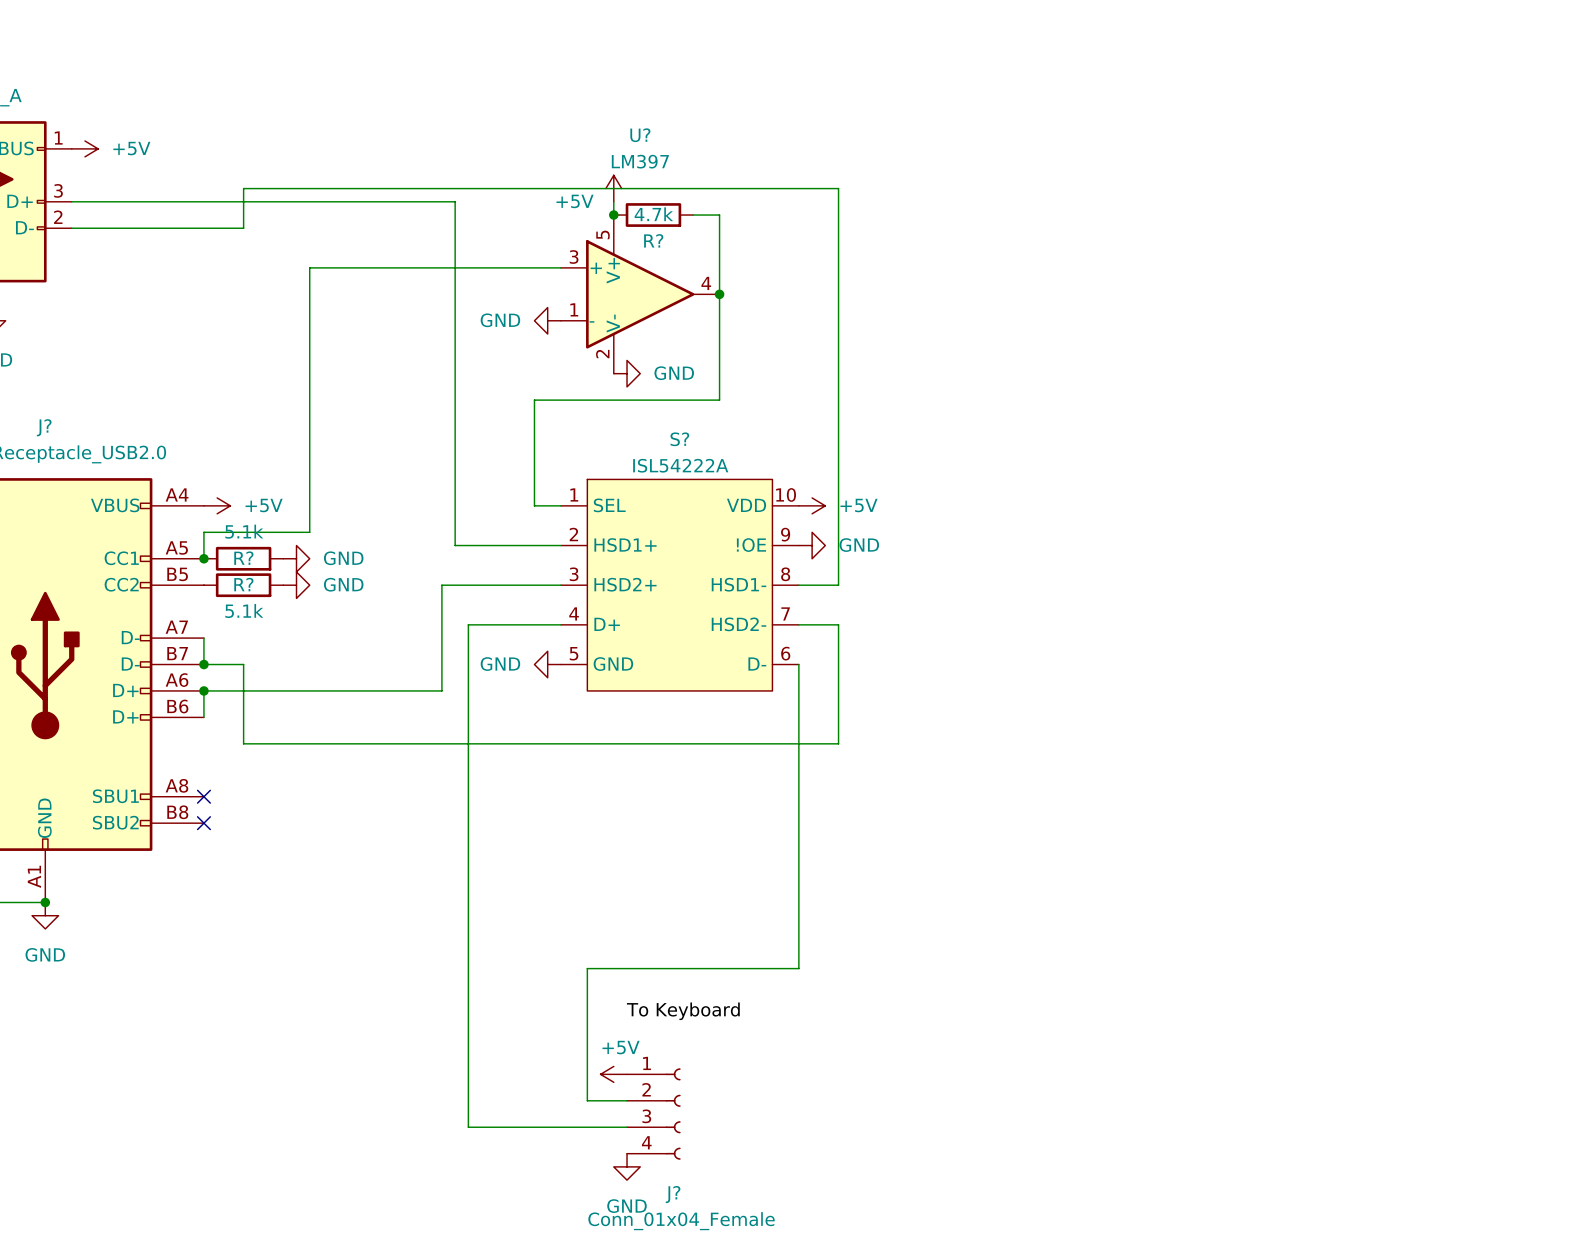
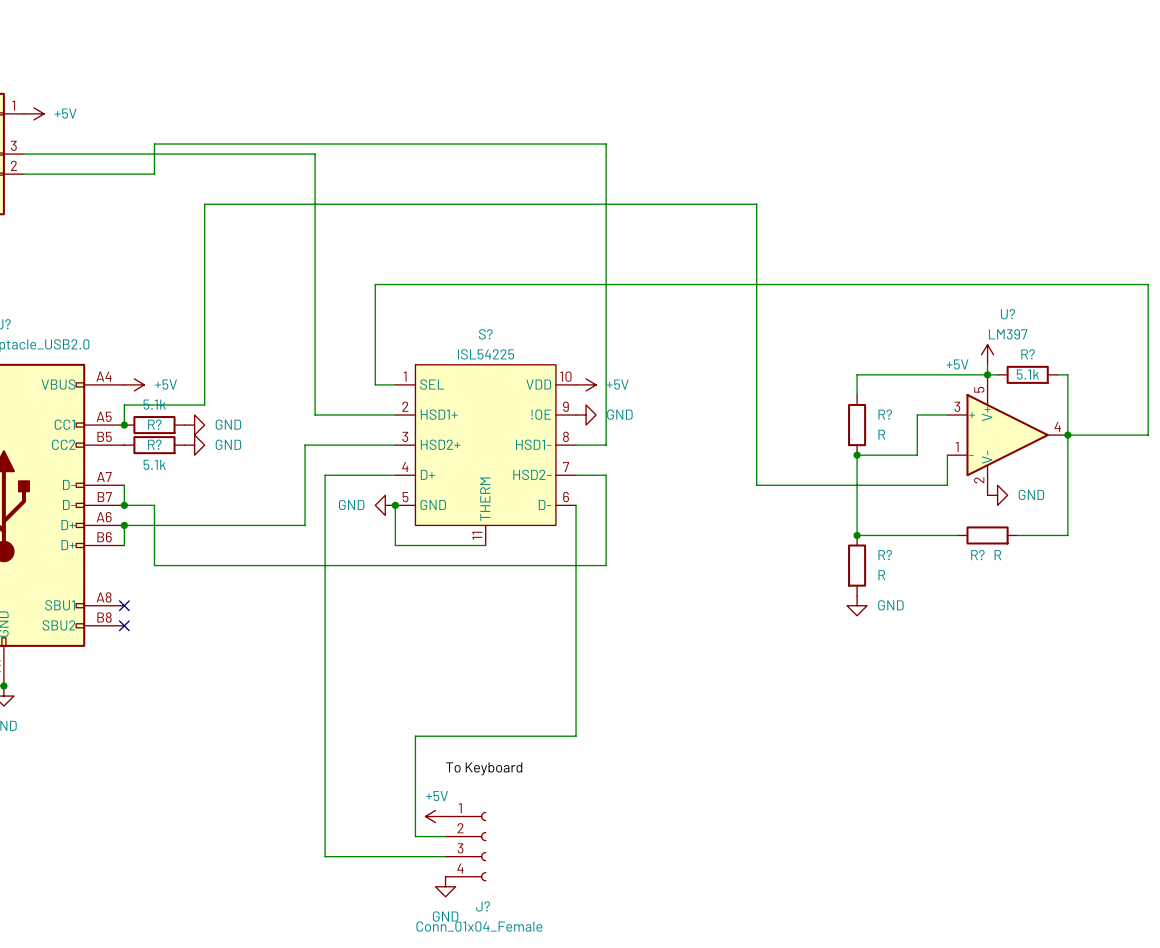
power symbol: +5V (613, 188) -> none
wire: (613, 201) (613, 215) -> none
junction: (613, 215) -> none
R?: 4.7k (653, 215) -> none
wire: (693, 215) (719, 215) (719, 400) (534, 400) -> (1067, 435) (1148, 435) (1148, 284) (375, 284) (375, 304)
wire: none -> (395, 204) (756, 204) (756, 485) (947, 485) (947, 455)
U?: LM397 (640, 294) -> none
junction: (719, 294) -> none
power symbol: GND (547, 320) -> none
power symbol: GND (627, 373) -> none
S?: ISL54222A (752, 413) -> none
S?: none -> ISL54225 (540, 324)
power symbol: none -> +5V (987, 354)
wire: none -> (987, 364) (987, 374)
junction: none -> (987, 374)
wire: none -> (997, 374) (857, 374) (857, 394)
R?: none -> 5.1k (1027, 374)
wire: none -> (1057, 374) (1067, 374) (1067, 535) (1017, 535)
wire: none -> (947, 415) (917, 415) (917, 455) (857, 455) (857, 535) (957, 535)
R?: none -> R (857, 425)
U?: none -> LM397 (1007, 435)
junction: none -> (1067, 435)
junction: none -> (857, 455)
power symbol: none -> GND (997, 495)
wire: none -> (395, 505) (395, 545) (485, 545)
junction: none -> (395, 505)
junction: none -> (857, 535)
R?: none -> R (987, 535)
R?: none -> R (857, 565)
power symbol: none -> GND (857, 605)

